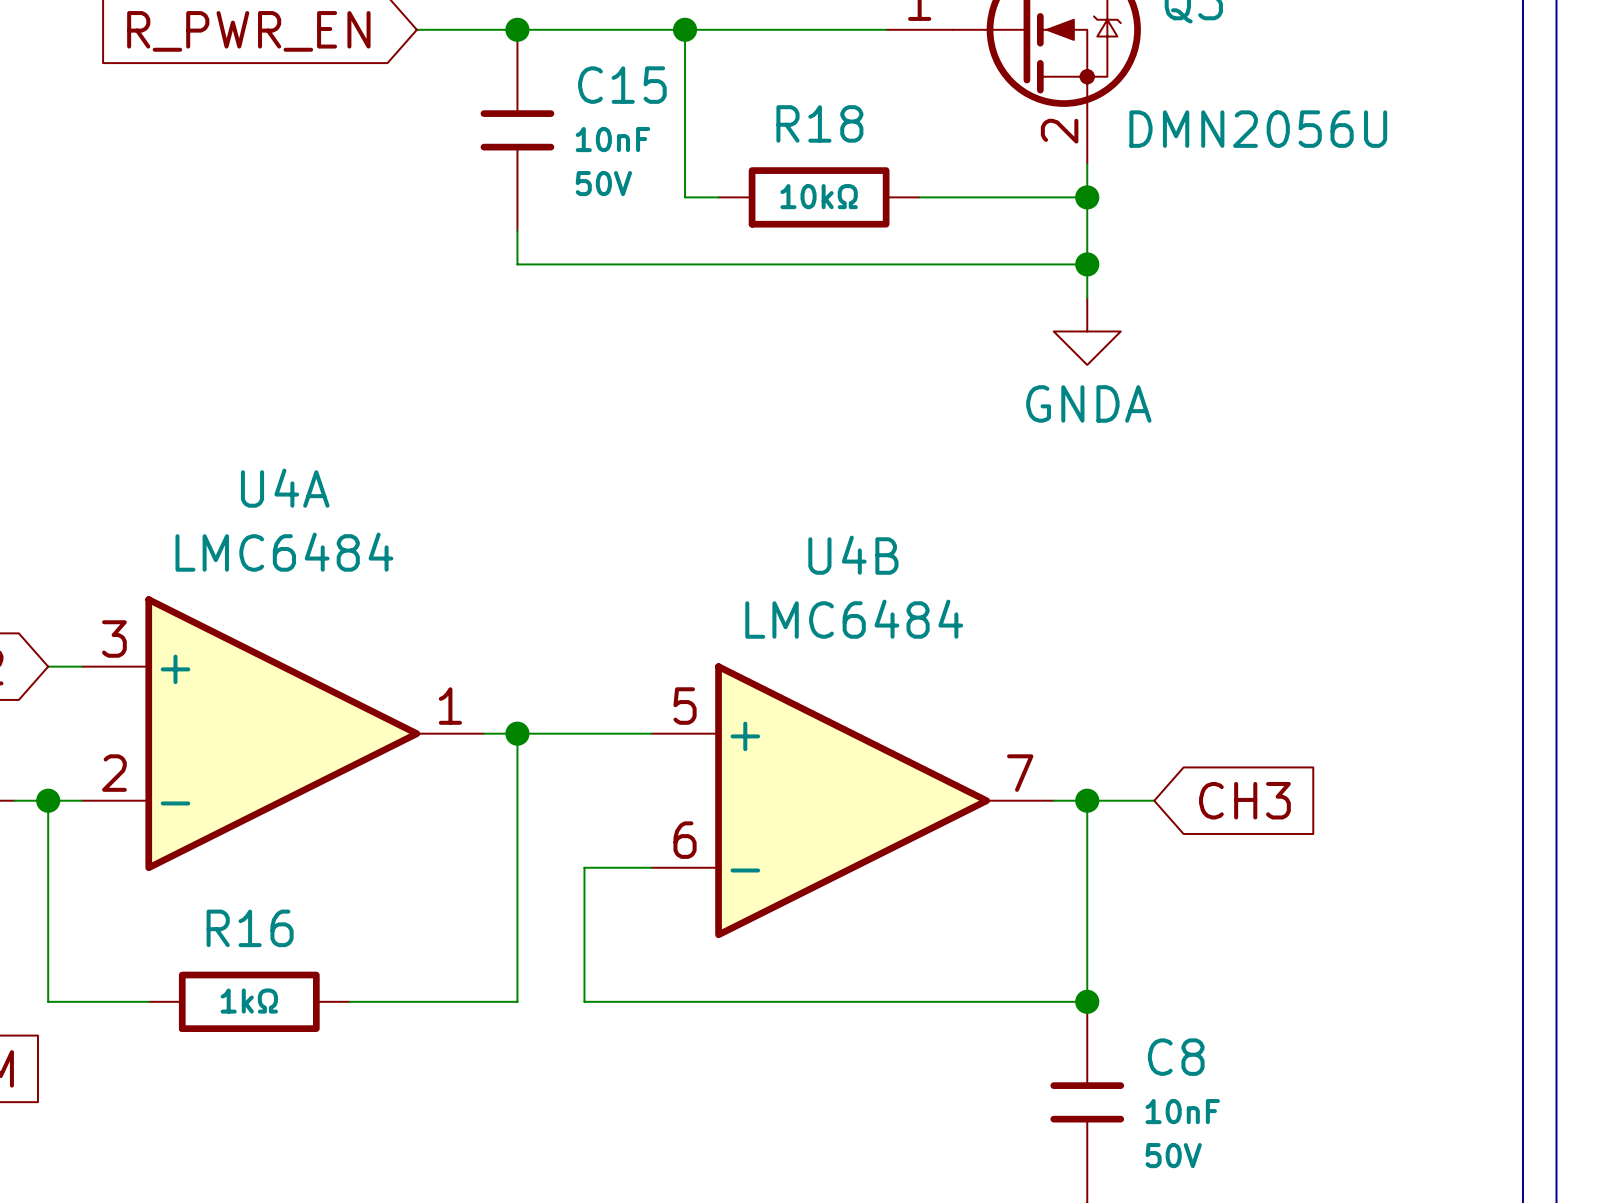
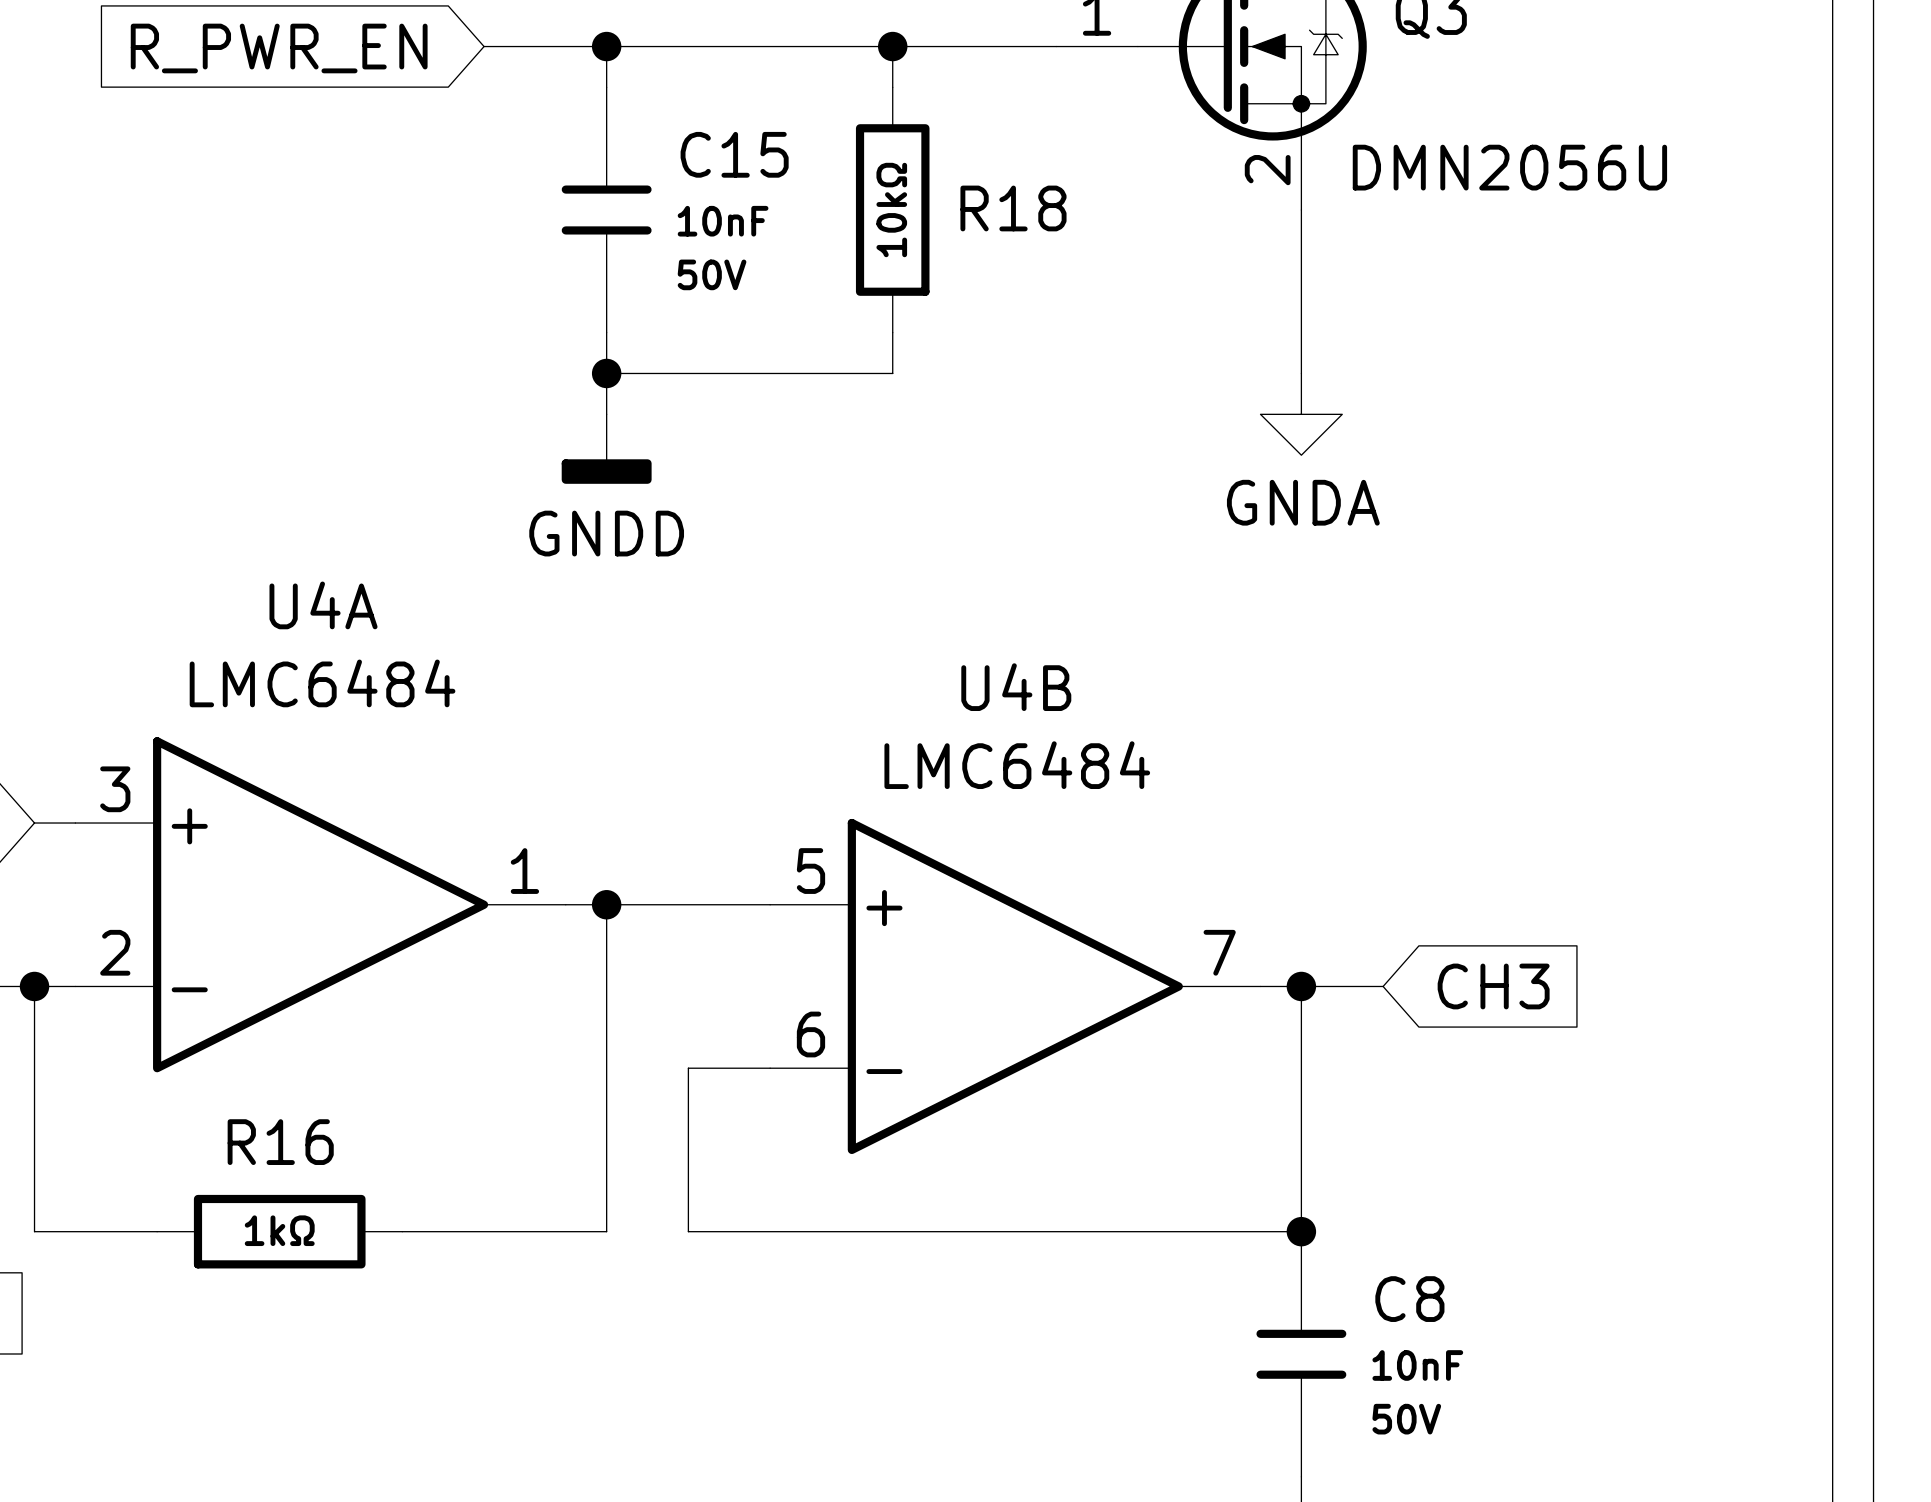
wire: (685, 29) (685, 197) (718, 197) -> none
junction position: (685, 29) -> (892, 46)
wire: none -> (892, 46) (892, 87)
C15 position: (517, 130) -> (606, 210)
R18 rotation: 0° (819, 197) -> 90° clockwise (892, 210)
wire: (919, 197) (1087, 197) -> none
junction: (1087, 197) -> none
wire: (517, 230) (517, 264) (1087, 264) -> none
wire: none -> (606, 332) (606, 414)
wire: none -> (892, 332) (892, 373) (606, 373)
junction: (1087, 264) -> none
junction: none -> (606, 373)
power symbol: none -> GNDD (606, 449)

